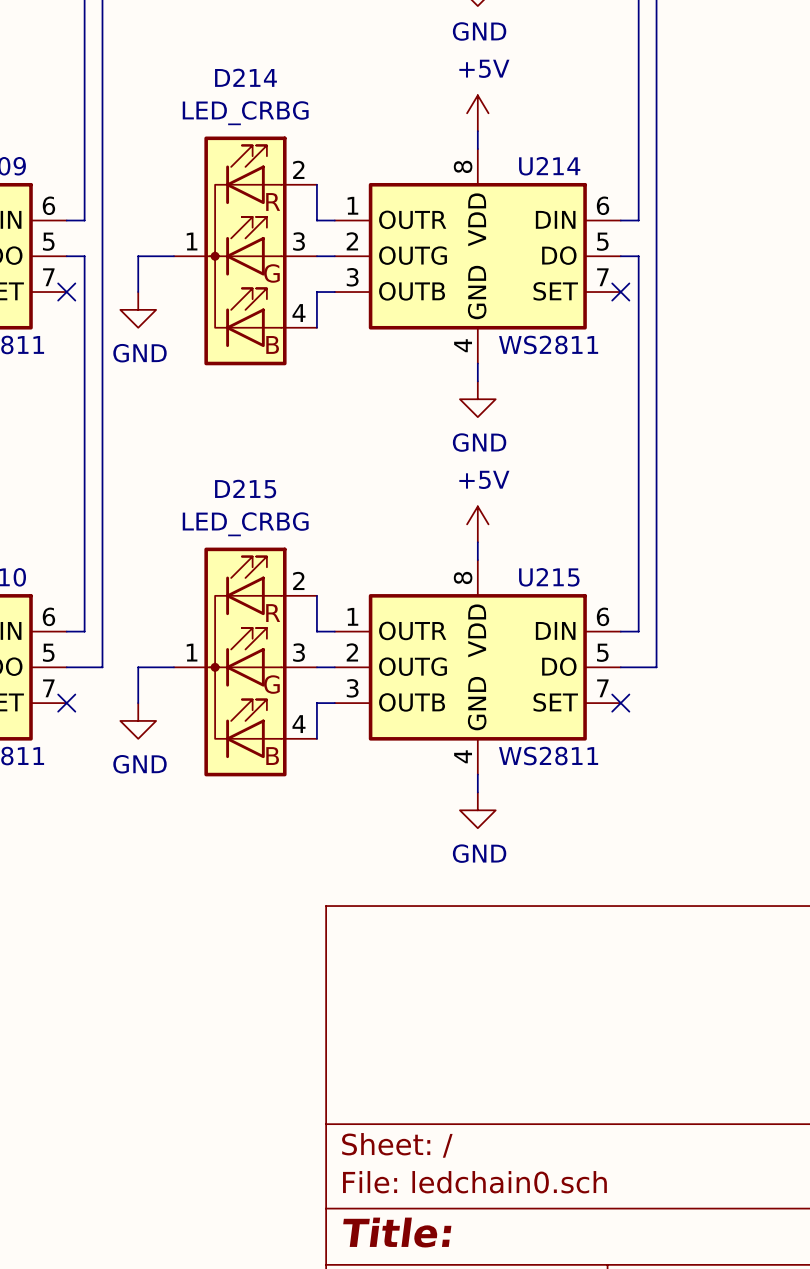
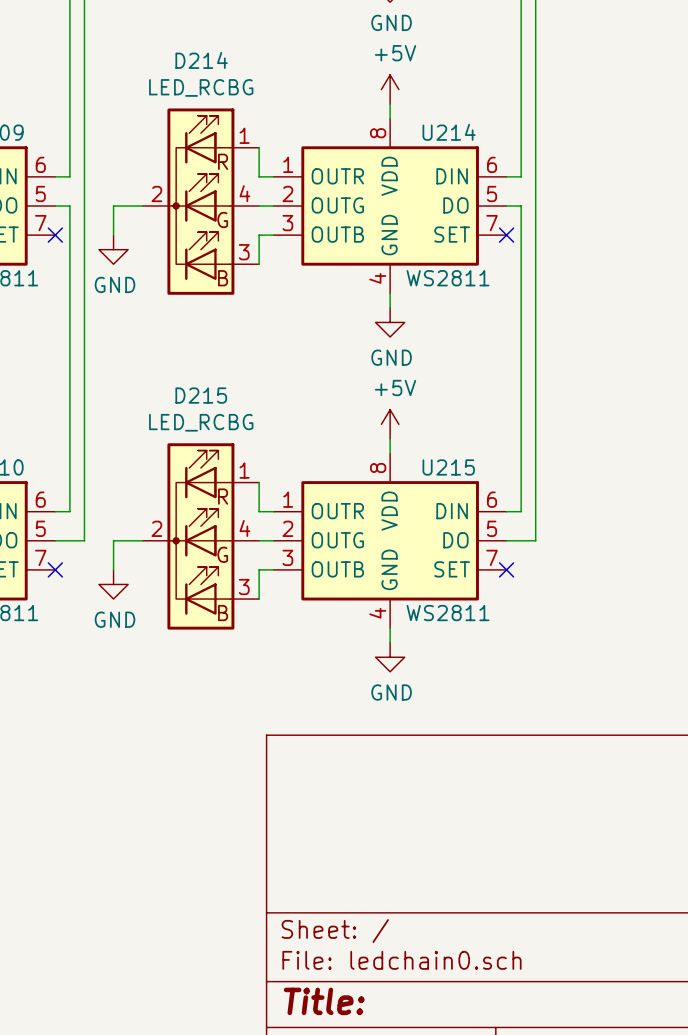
D214 value: LED_CRBG (245, 113) -> LED_RCBG (201, 87)
D214 symbol: [173, 136, 317, 366] -> [142, 108, 260, 295]
D215 value: LED_CRBG (245, 524) -> LED_RCBG (201, 422)
D215 symbol: [173, 547, 317, 777] -> [142, 443, 260, 630]

